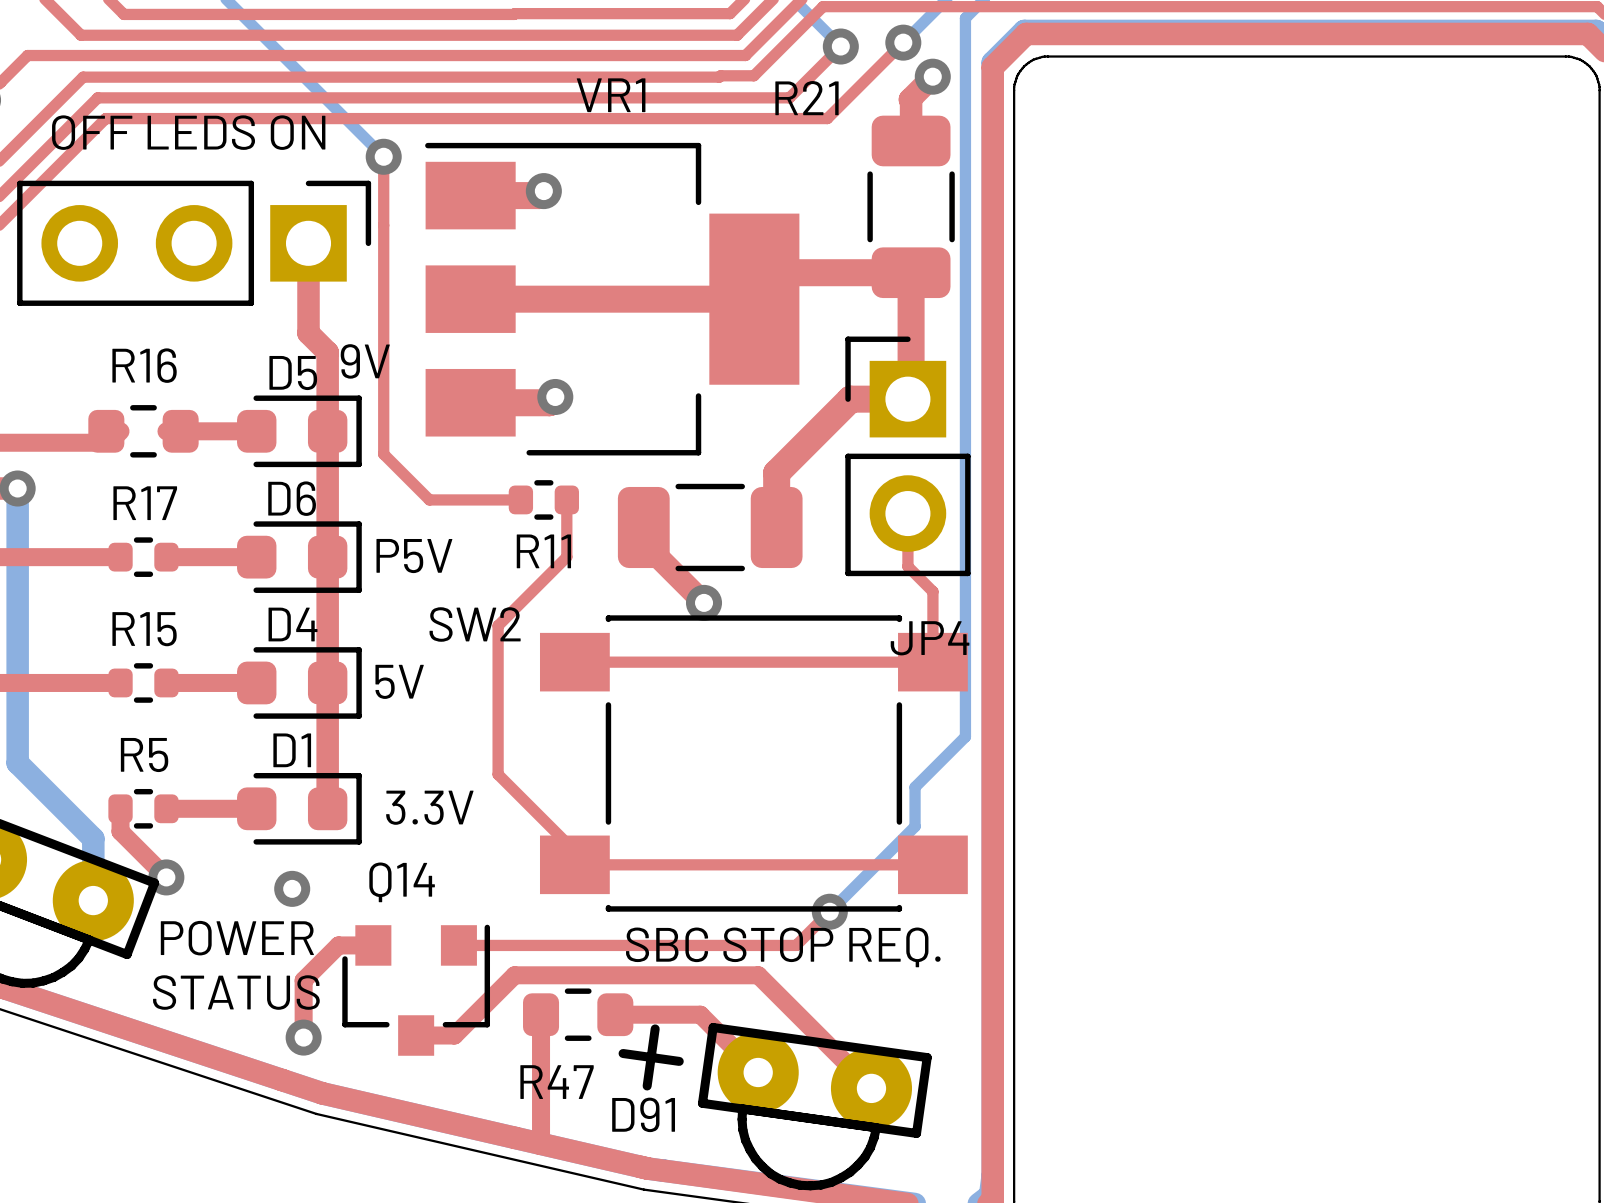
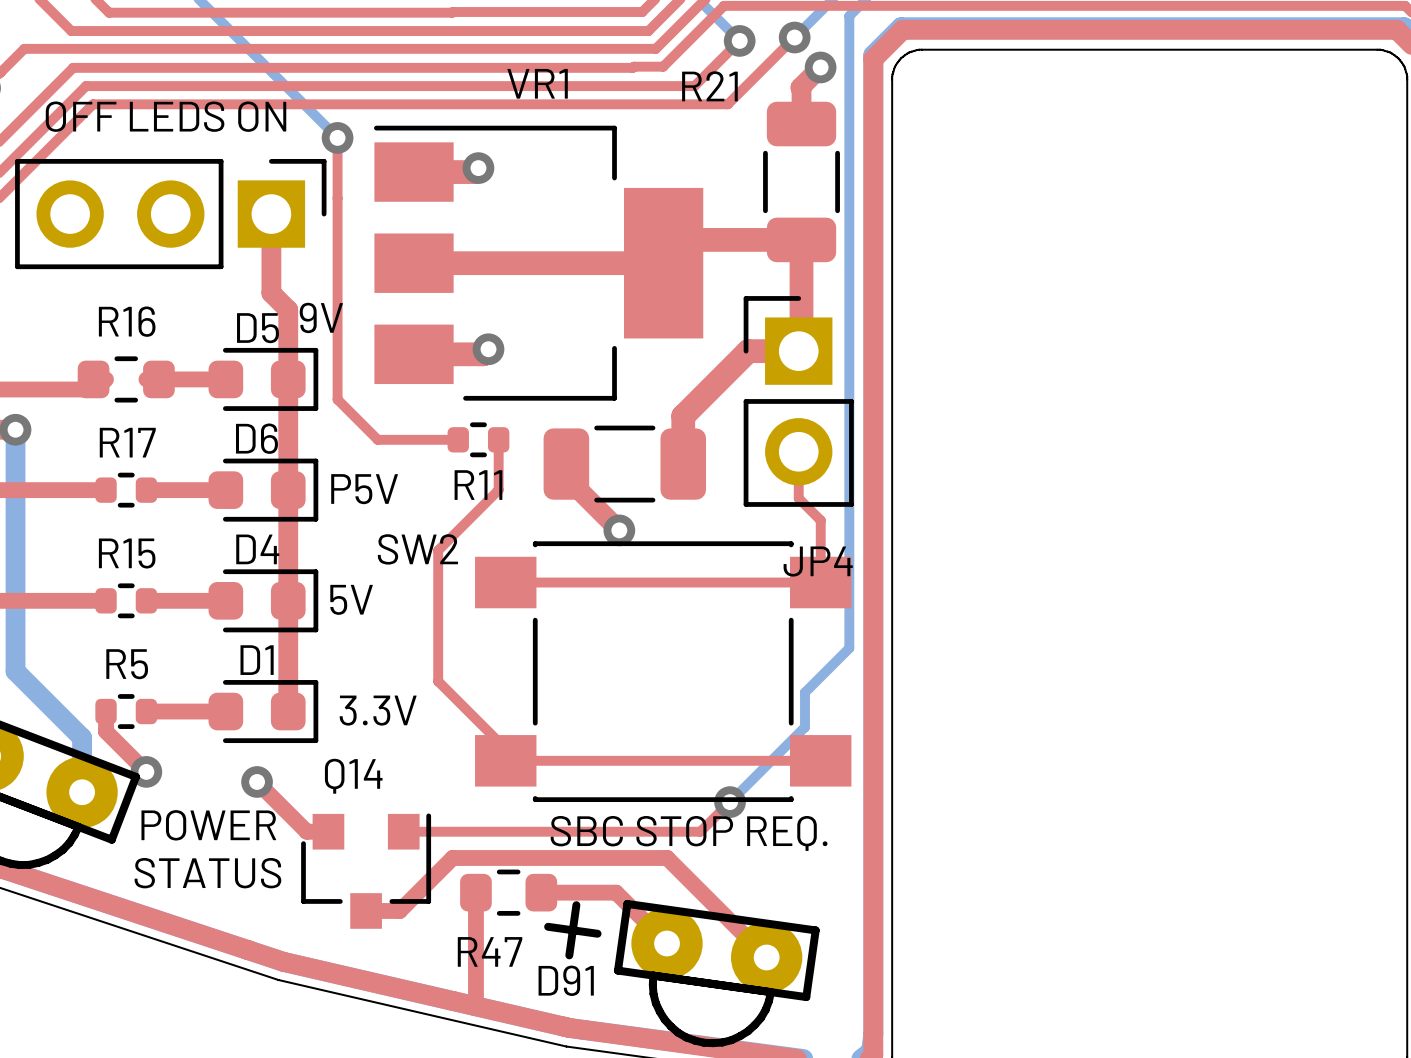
top track: (348, 945) (338, 945) (303, 980) (303, 1037) -> (306, 831) (257, 781)
via: (303, 1037) -> none

